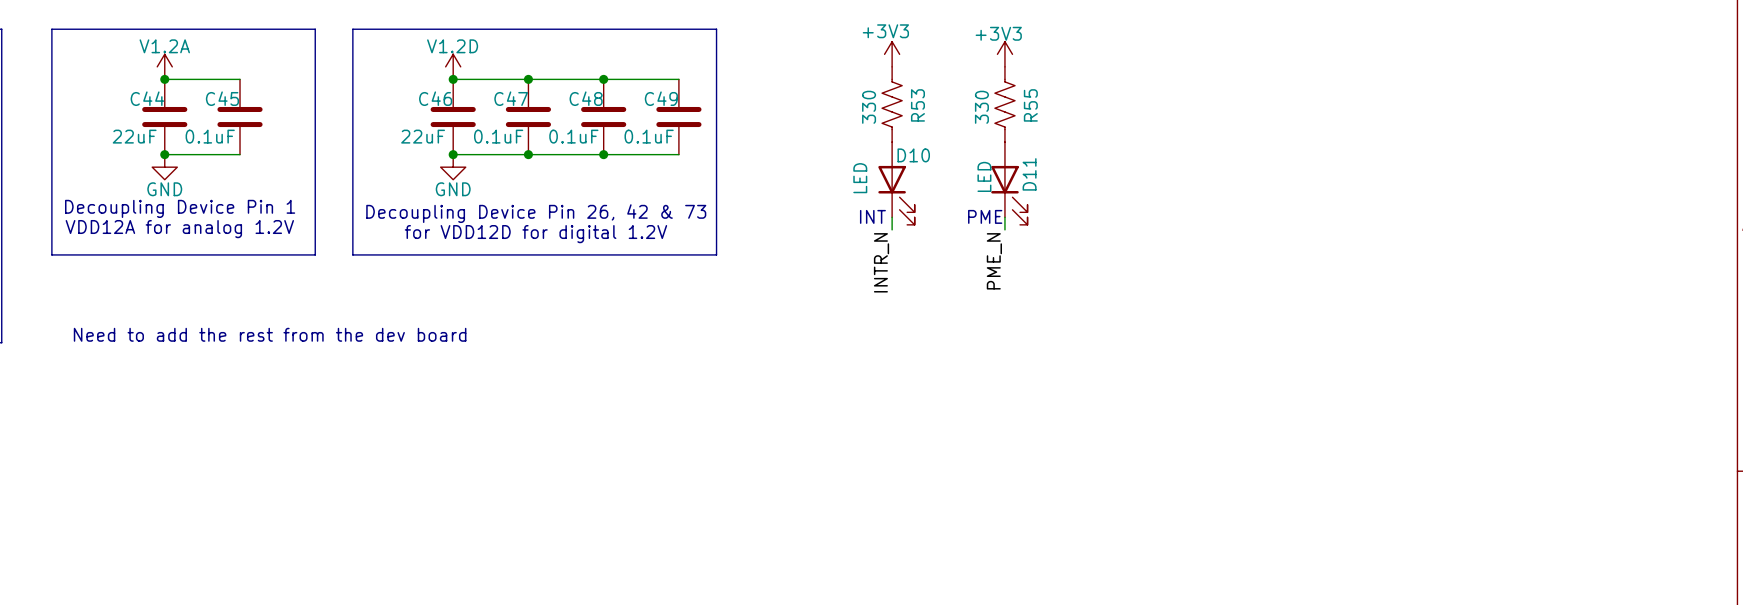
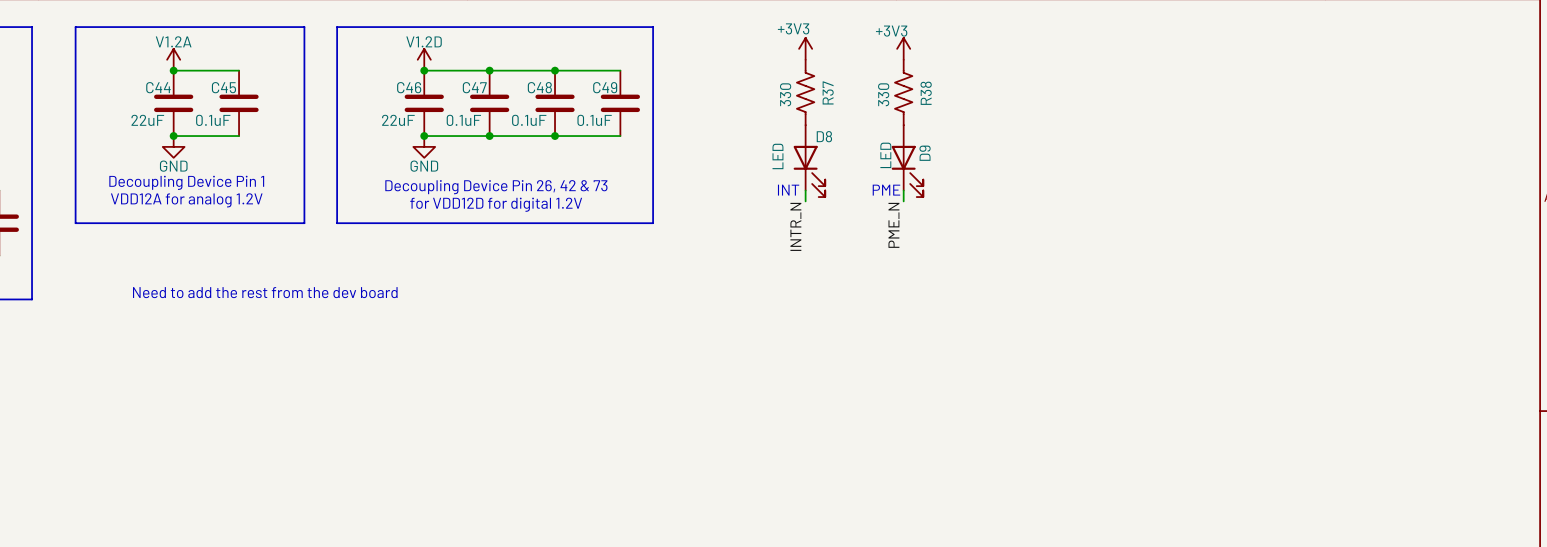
R53 name: R53 (917, 105) -> R37 (828, 92)
R55 name: R55 (1030, 105) -> R38 (926, 93)
D10 name: D10 (913, 155) -> D8 (824, 136)
D11 name: D11 (1029, 174) -> D9 (925, 153)

